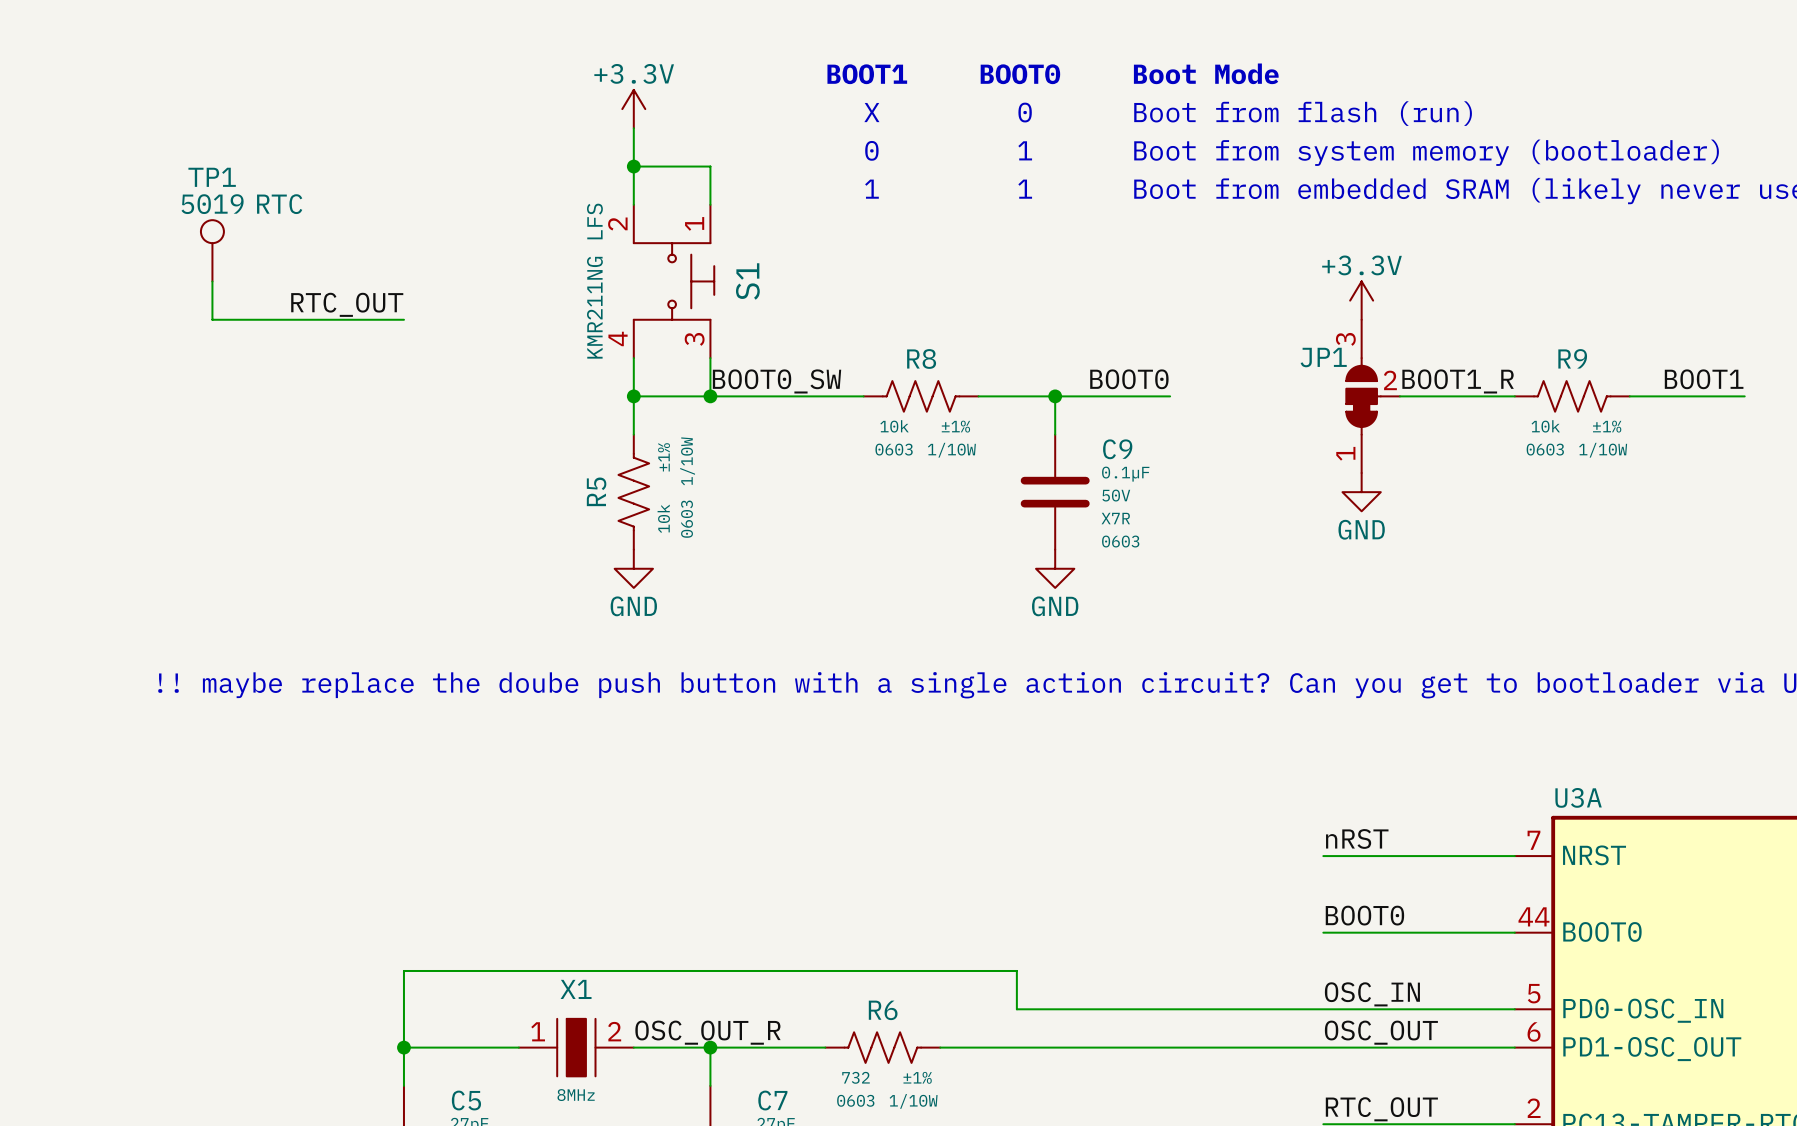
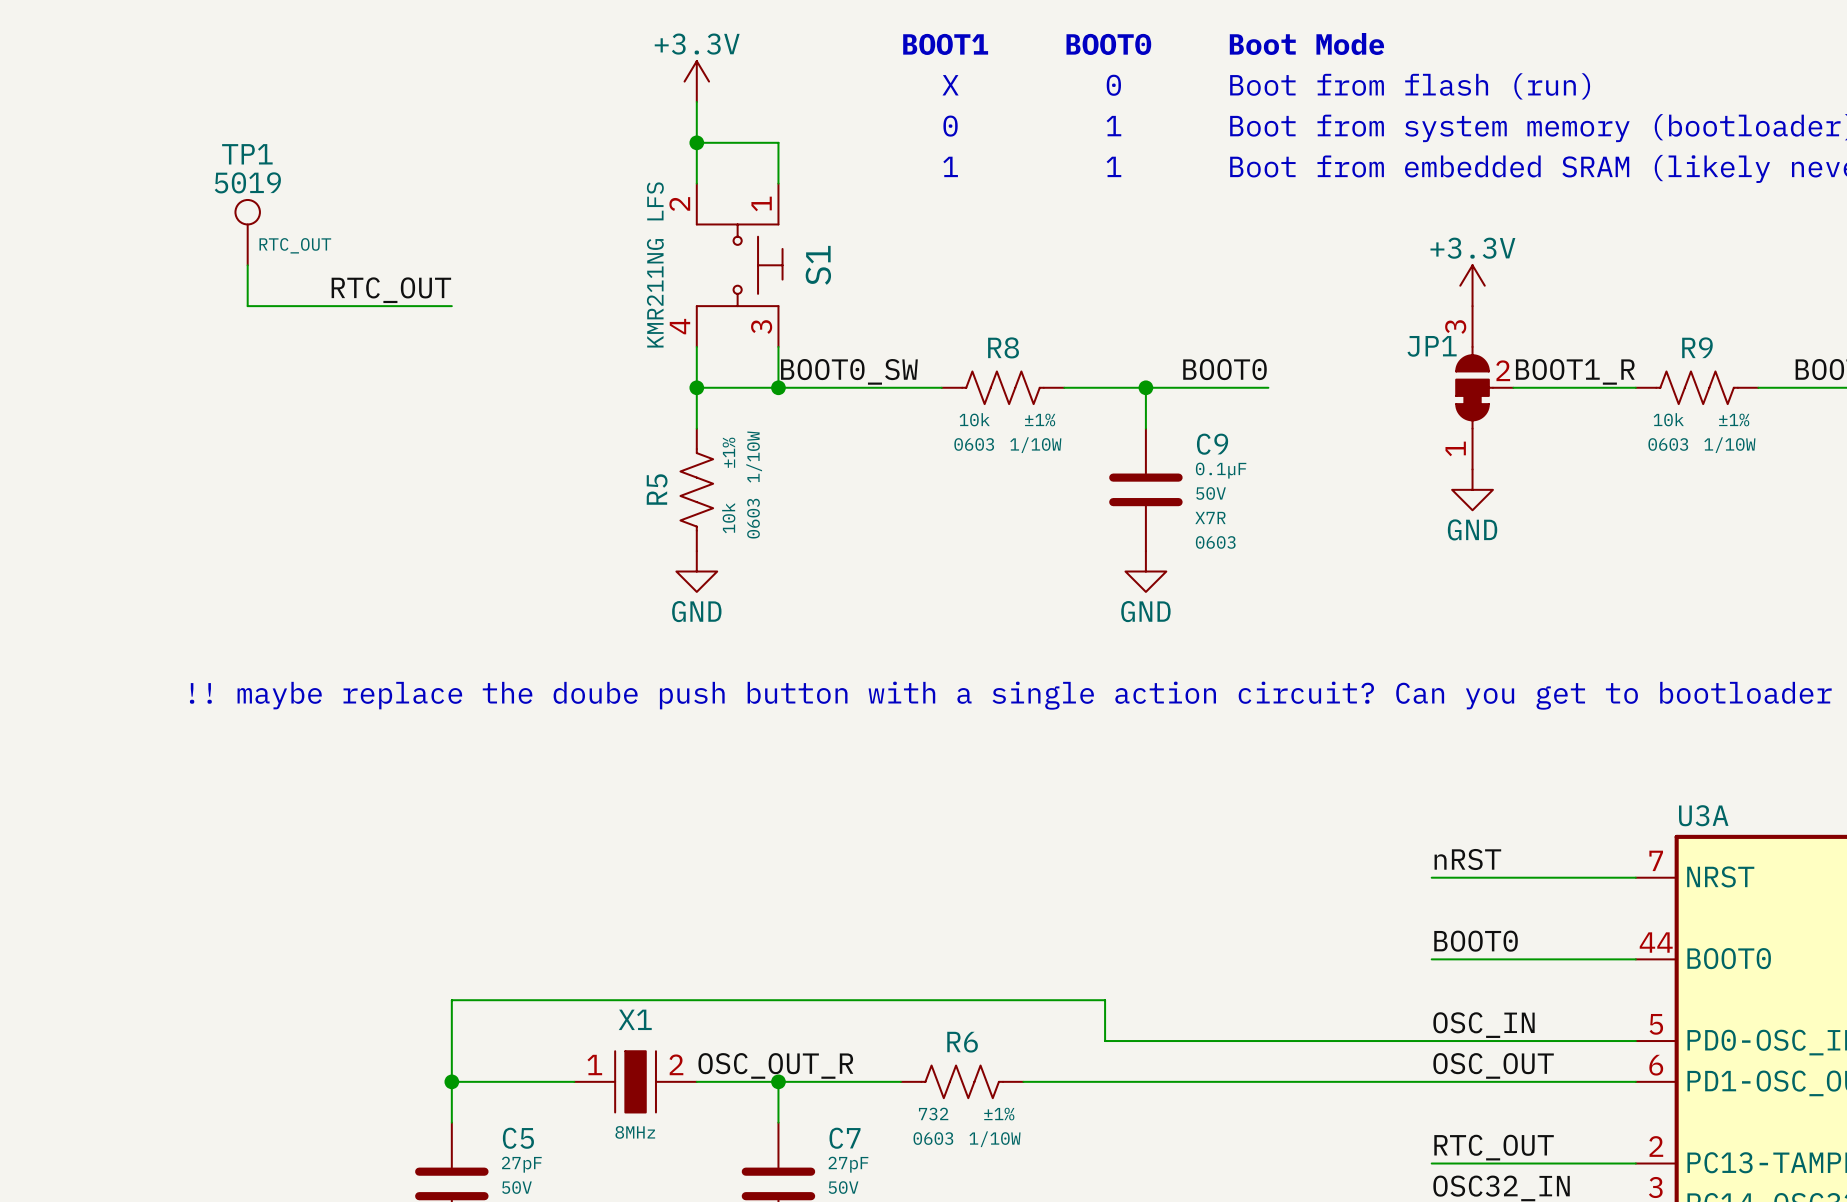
TP1 value: RTC (279, 204) -> none
TP1 text: none -> RTC_OUT (295, 245)

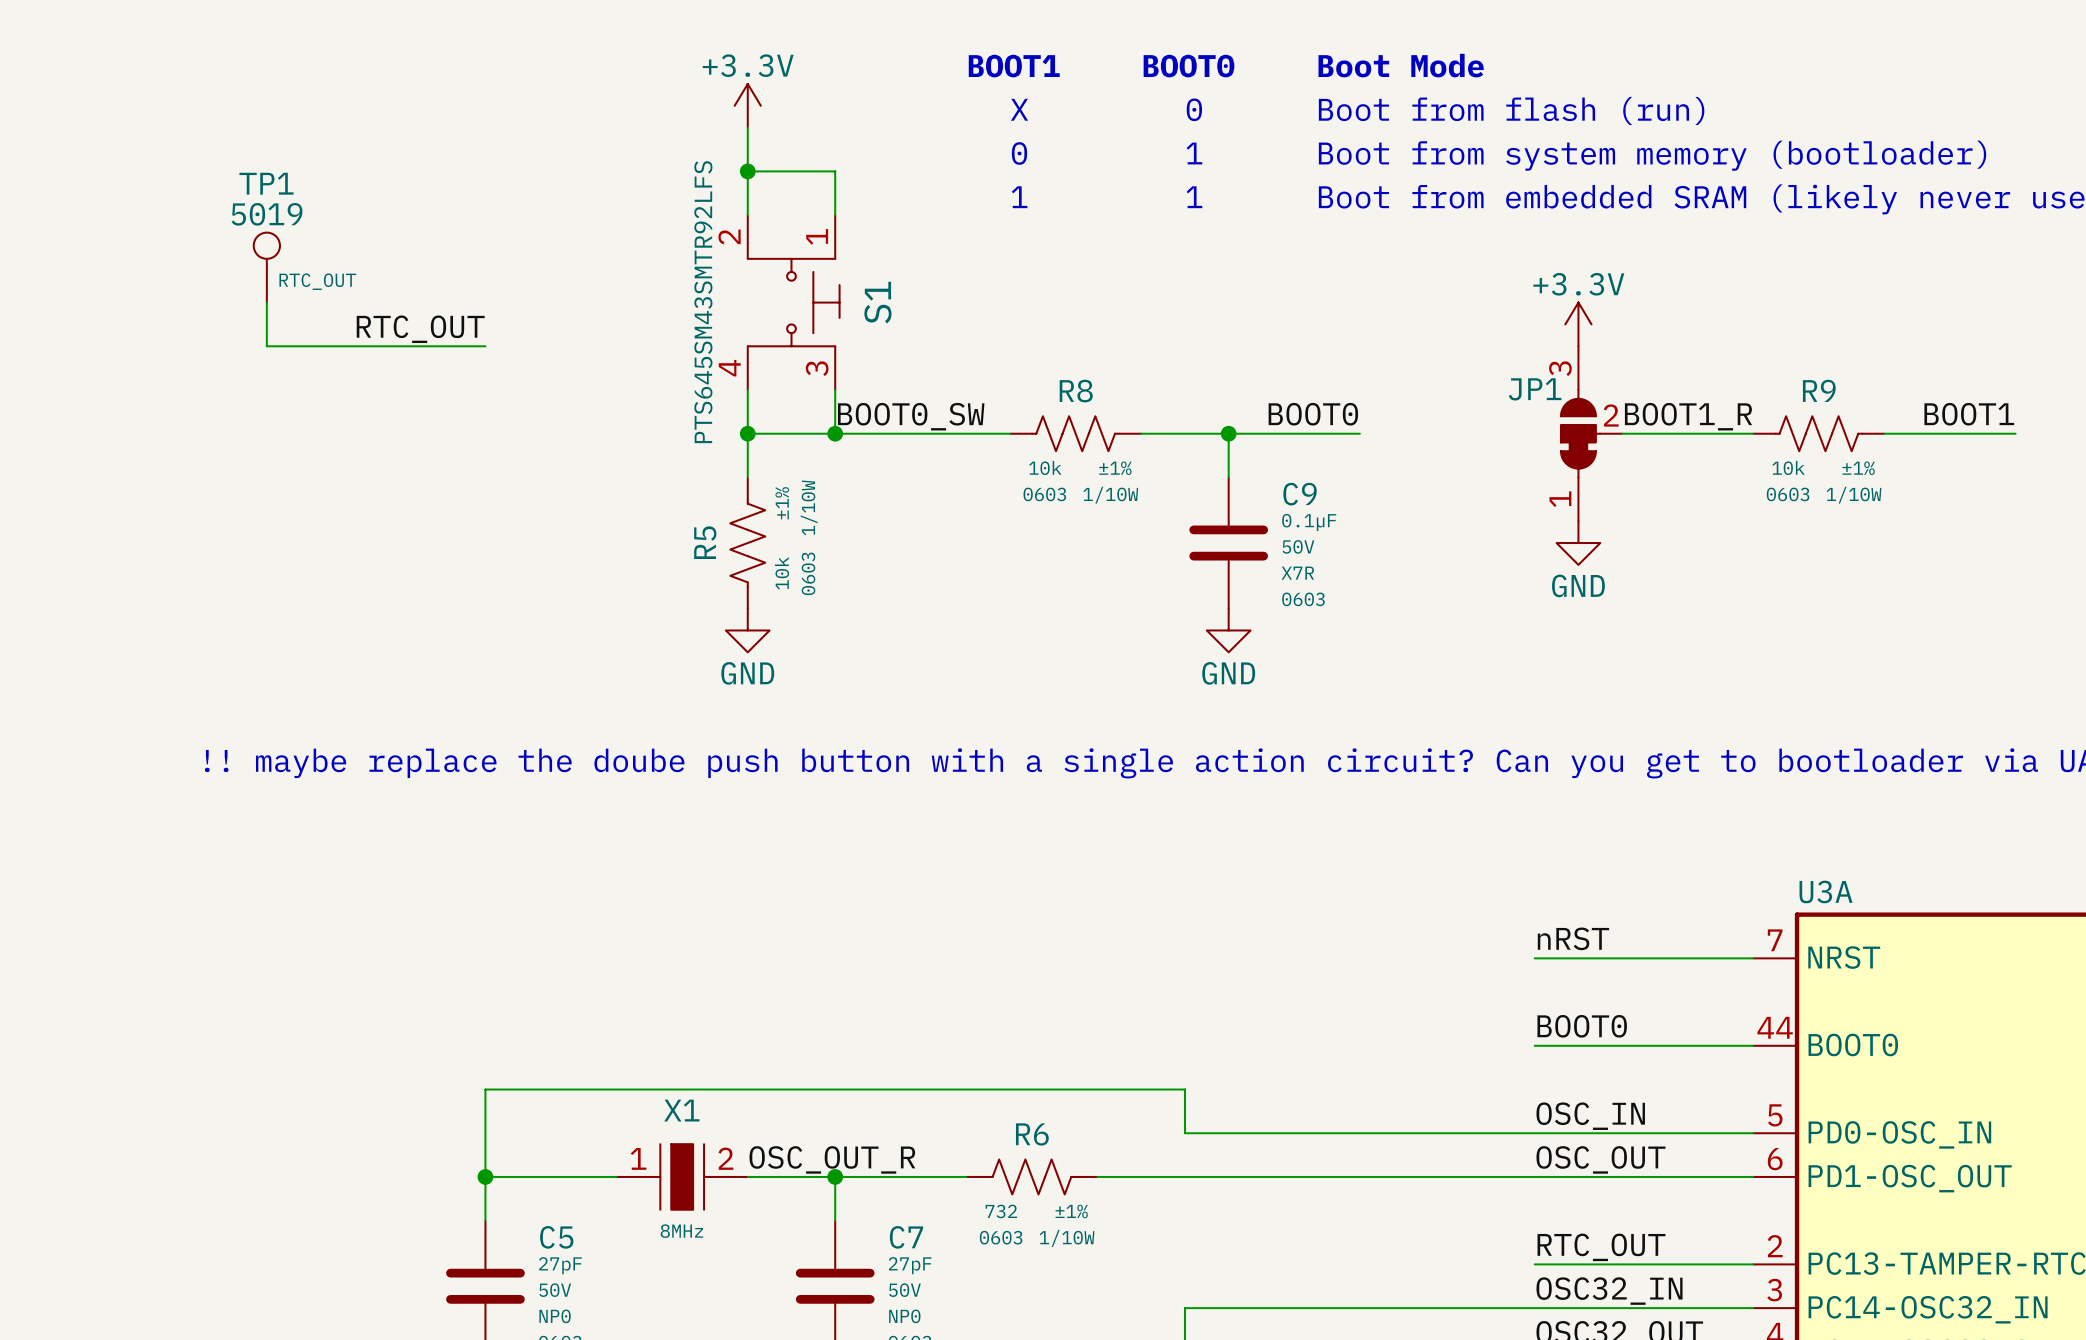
S1 text: KMR211NG LFS (655, 264) -> PTS645SM43SMTR92LFS (703, 302)

